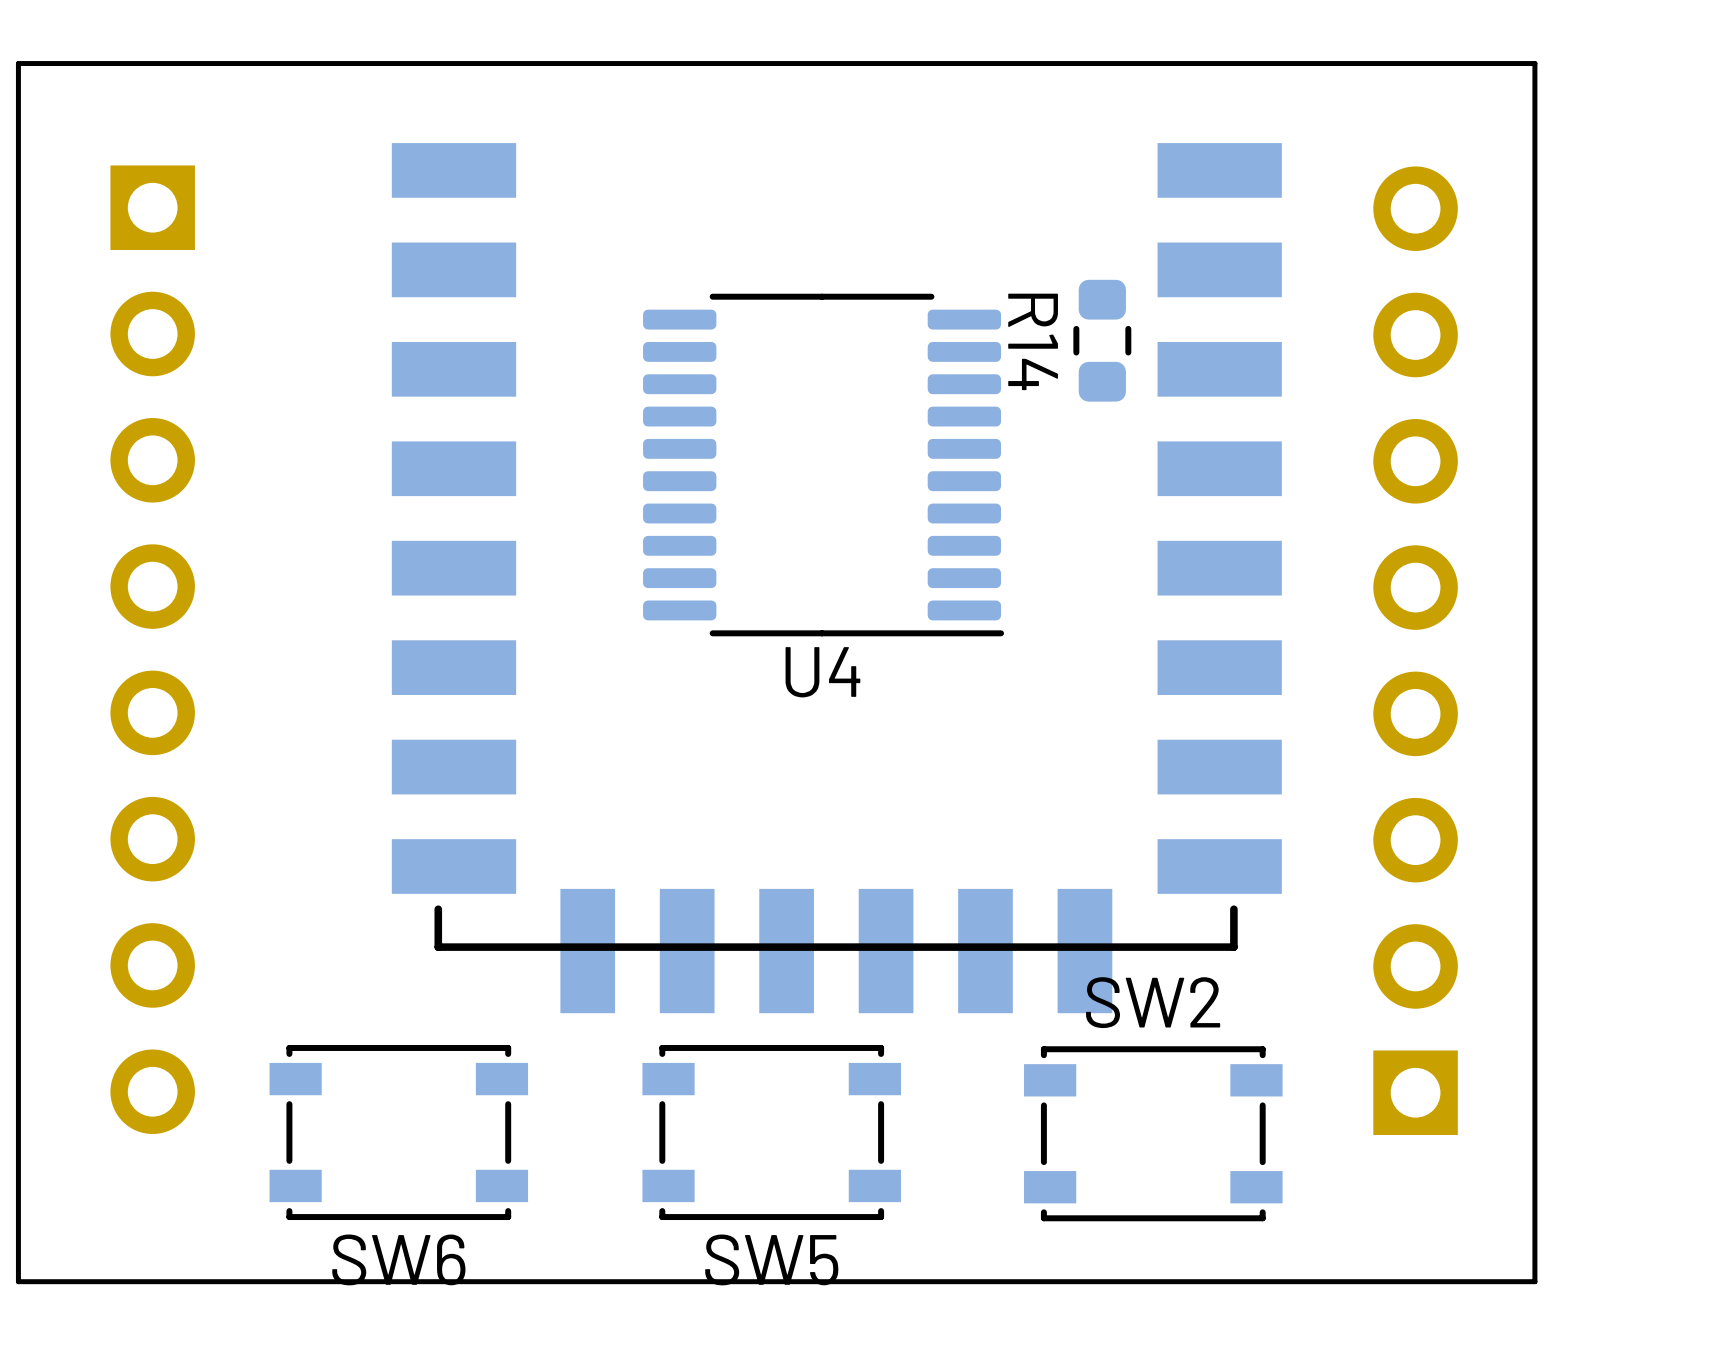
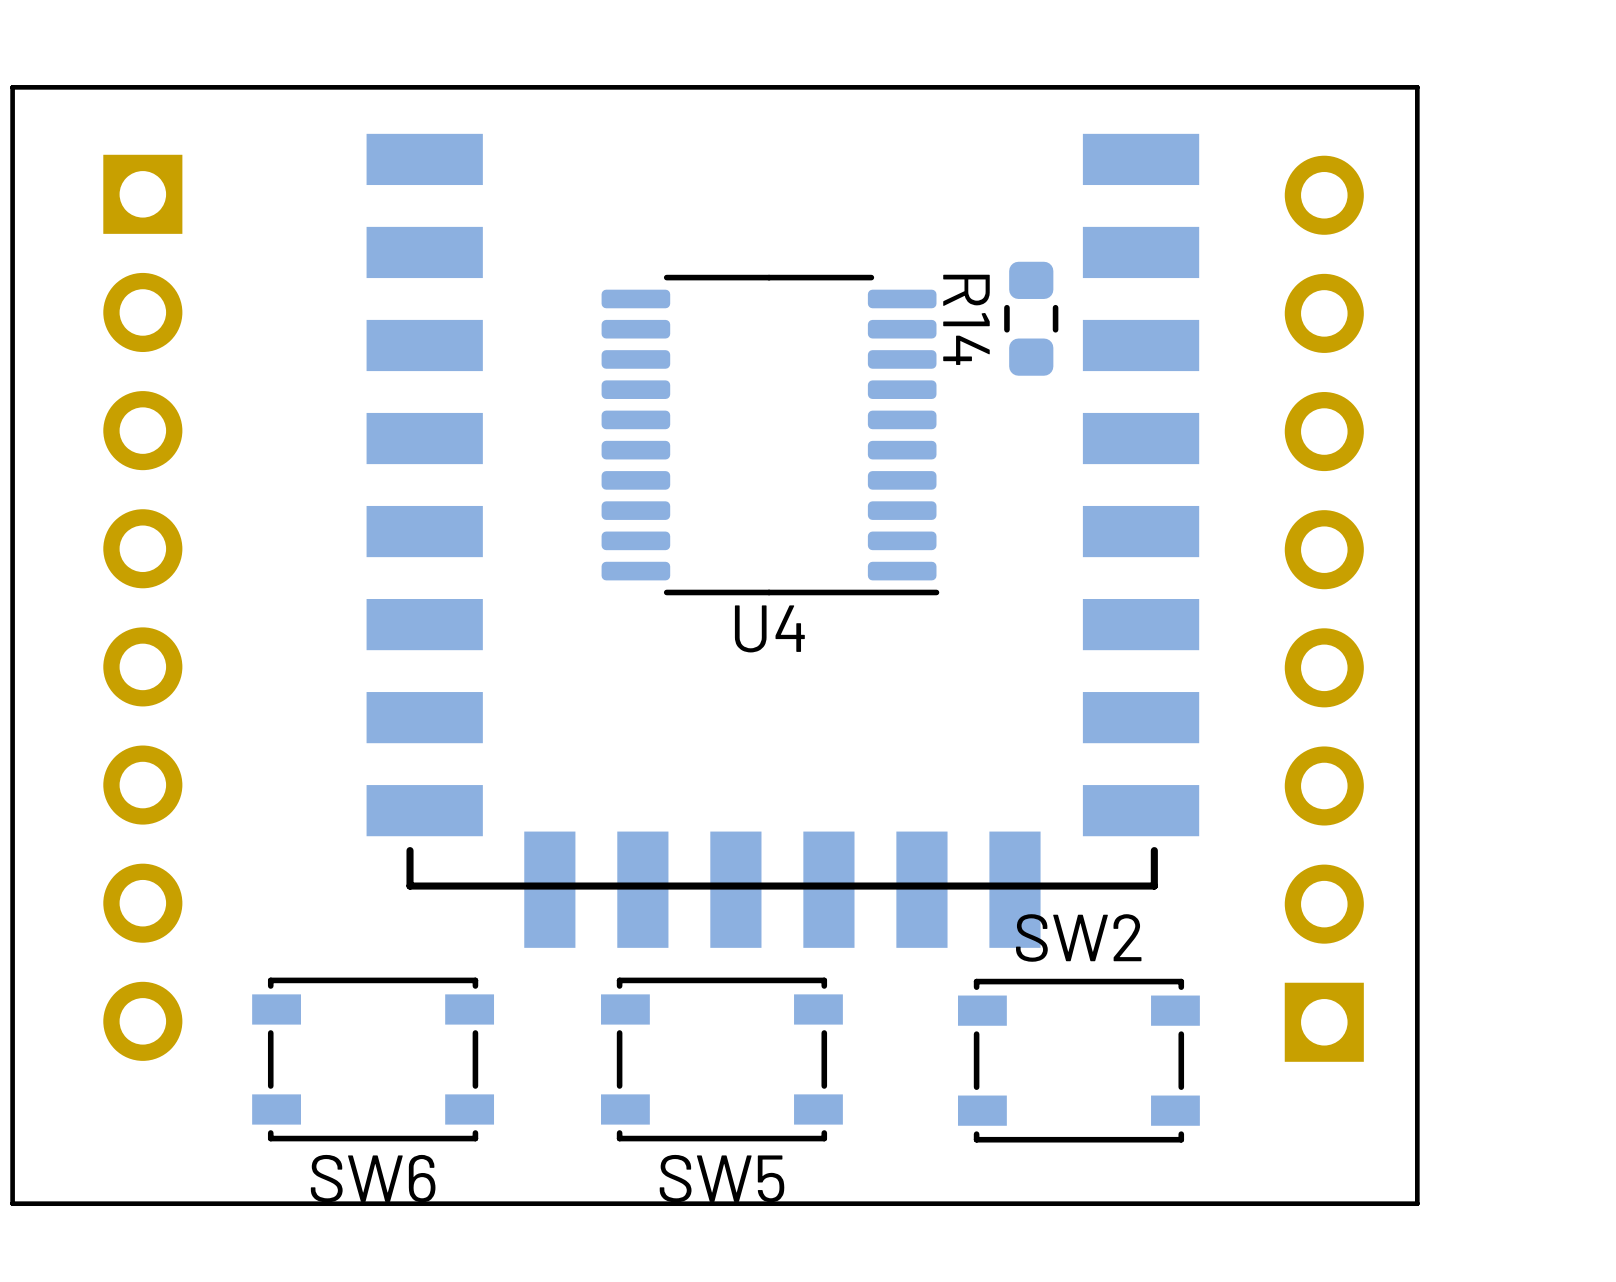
board edge: (1534, 63) (18, 63) (18, 1281) (1534, 1281) (1534, 63) -> (1417, 87) (1417, 1203) (12, 1203) (12, 87) (1417, 87)

